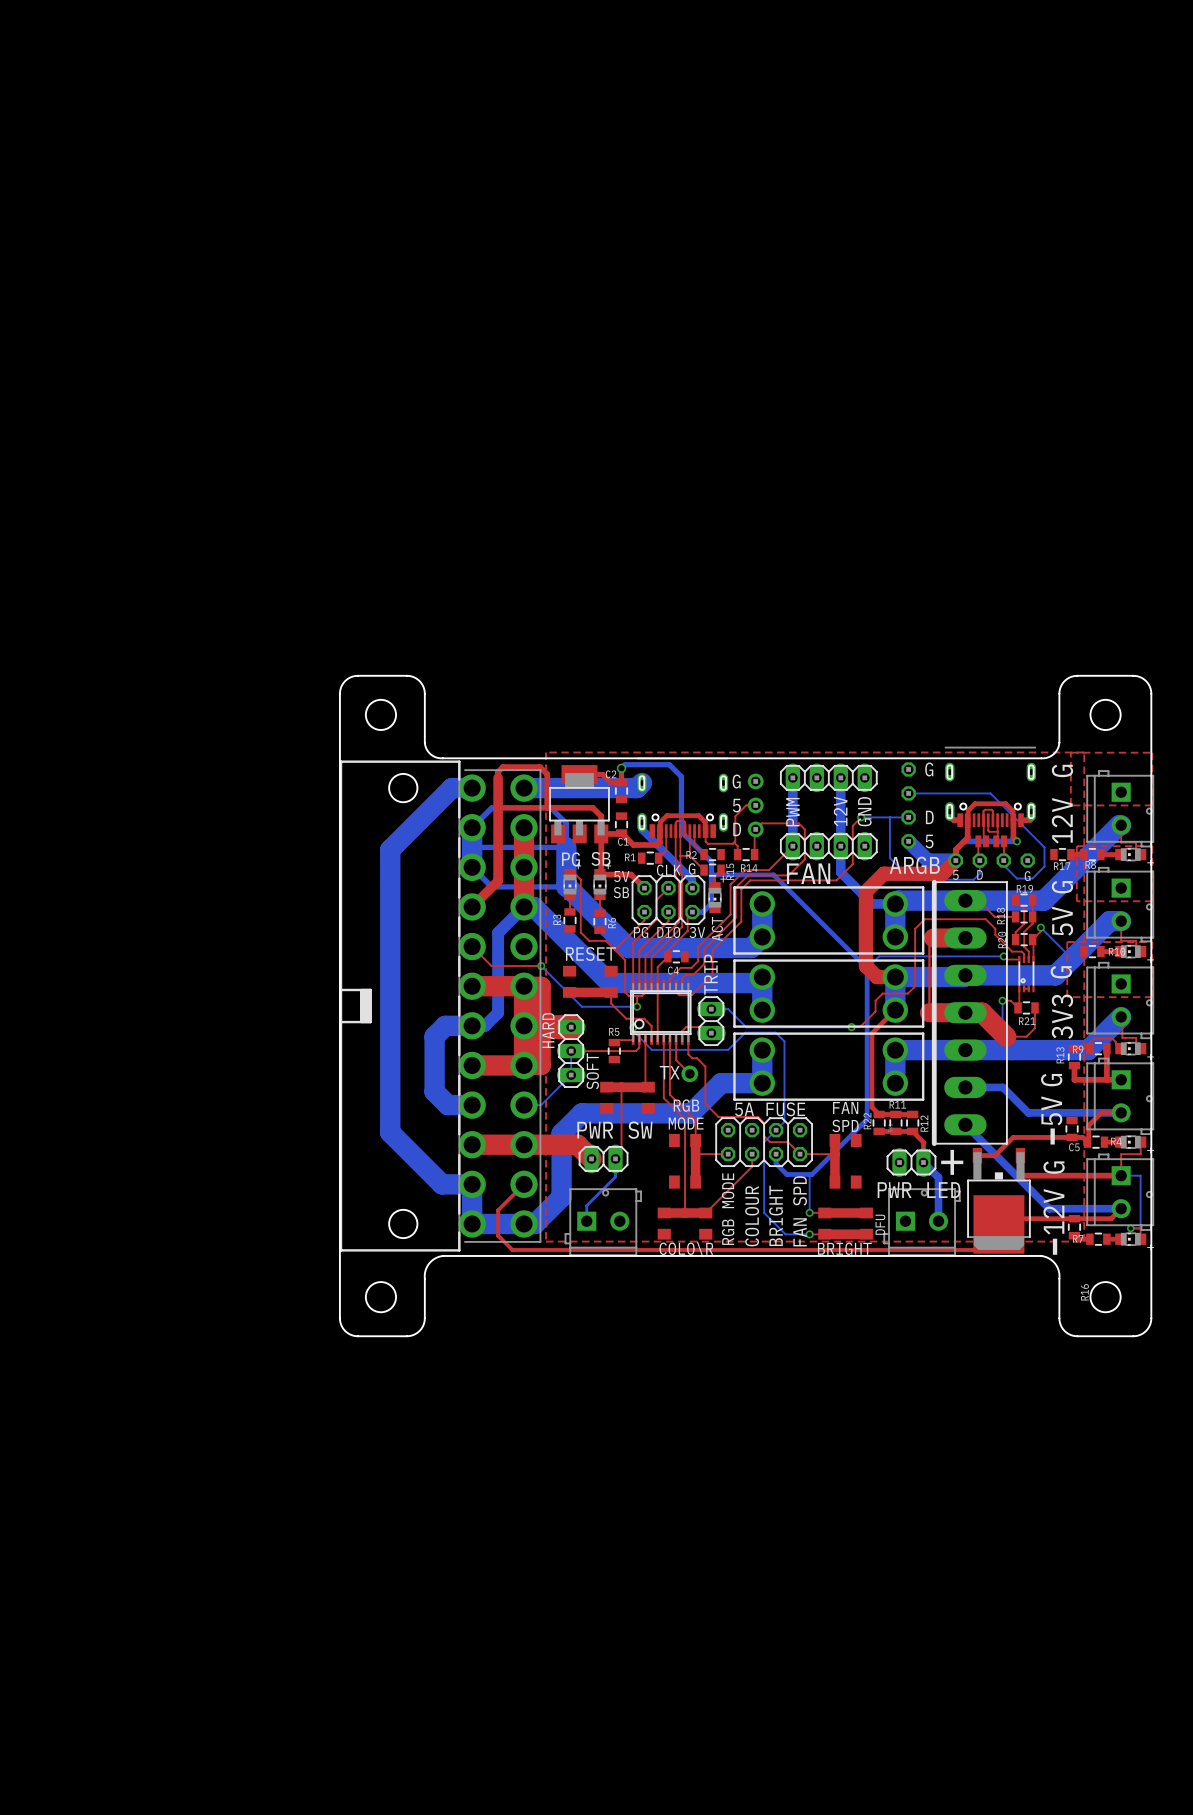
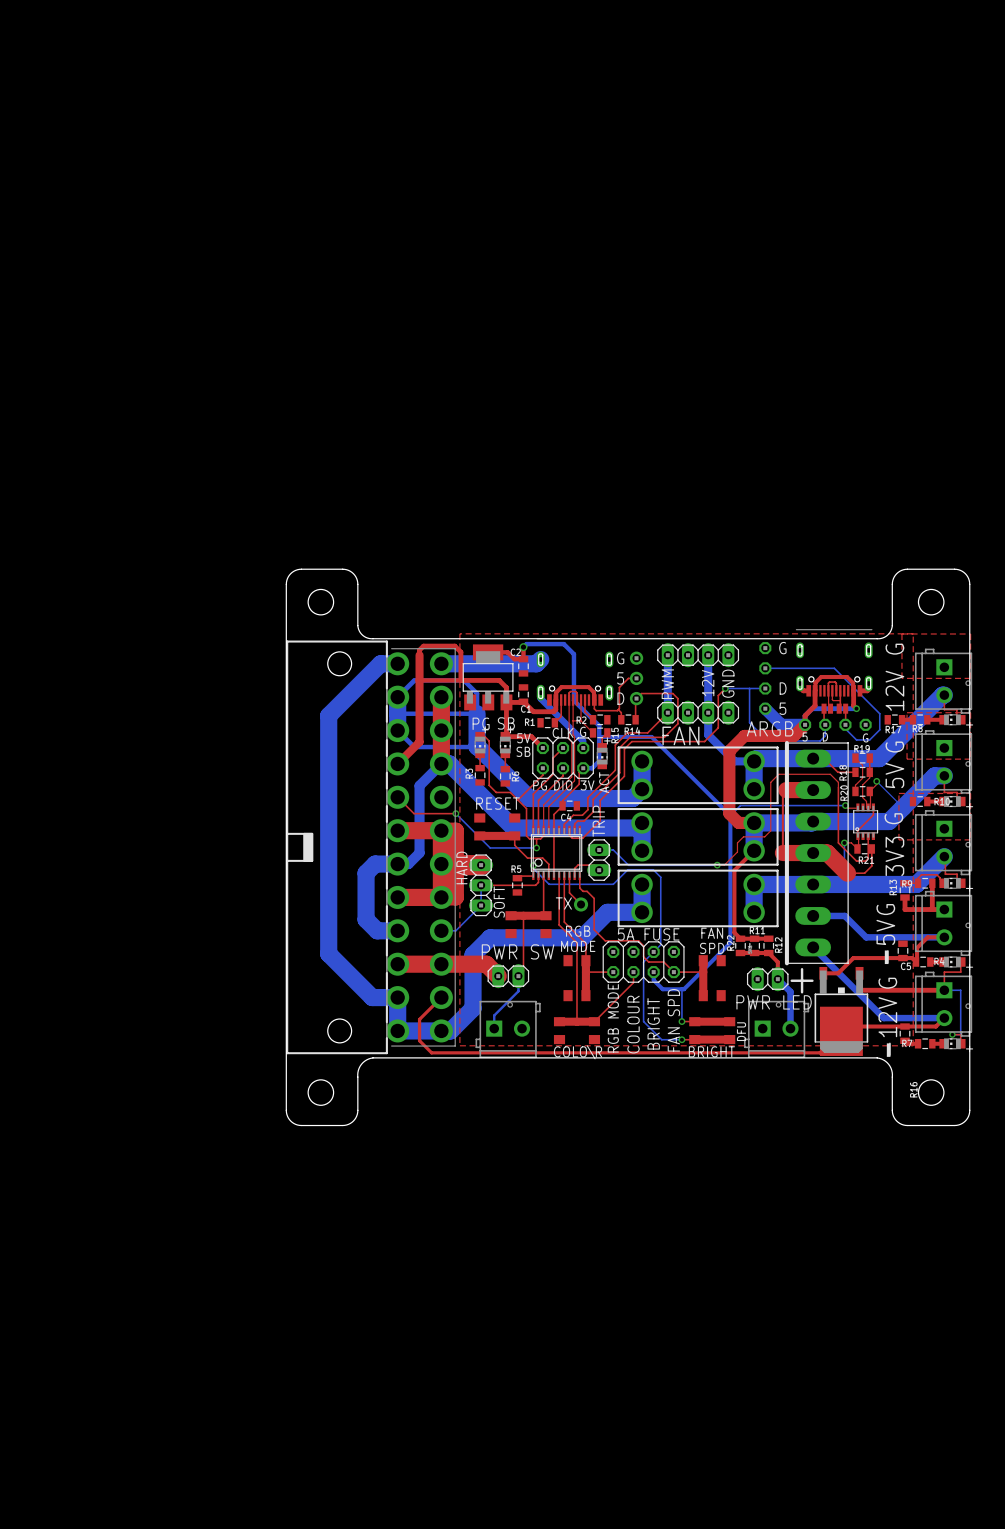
top track: (995, 934) (1012, 951) (1021, 951) (1024, 953) (1024, 959) -> (838, 787) (838, 842) (856, 861) (865, 861) (868, 858) (868, 836)
part footprint: [1018, 955, 1035, 993] -> [853, 803, 879, 841]
top track: none -> (873, 807) (873, 814) (857, 830) (857, 836)

